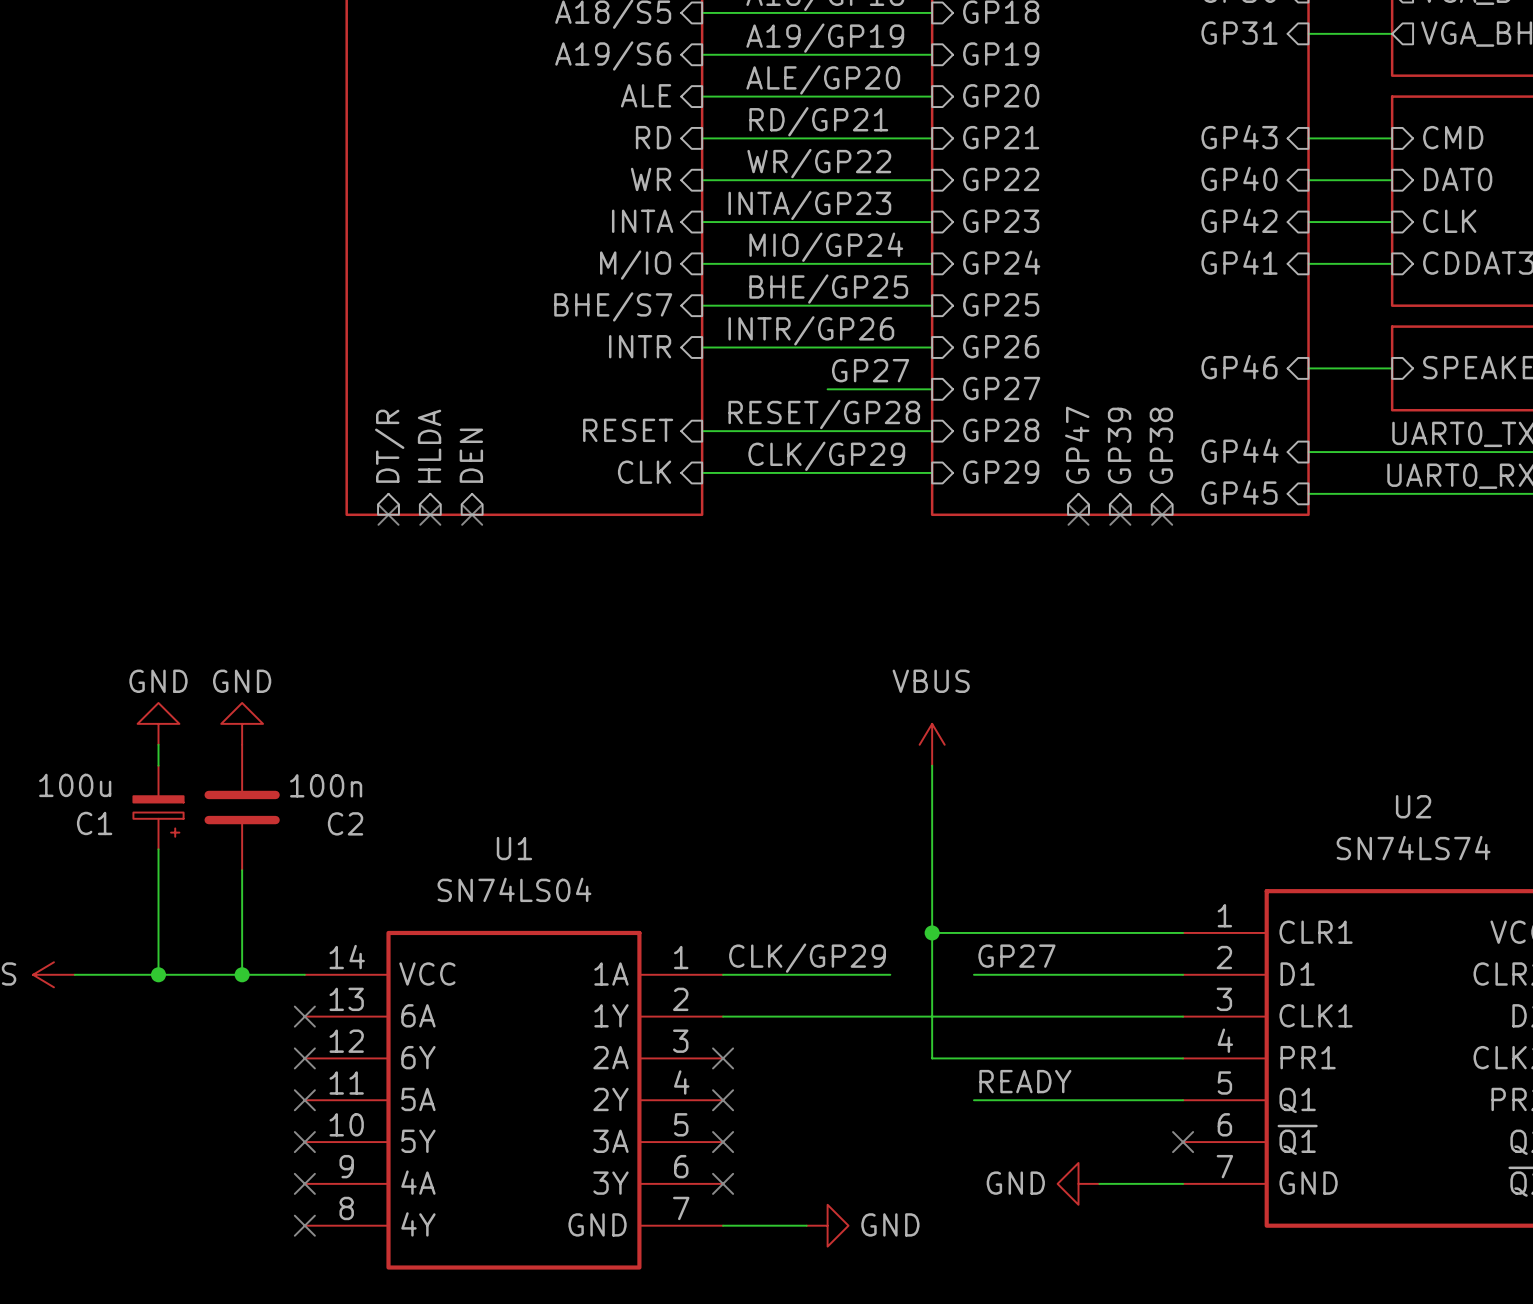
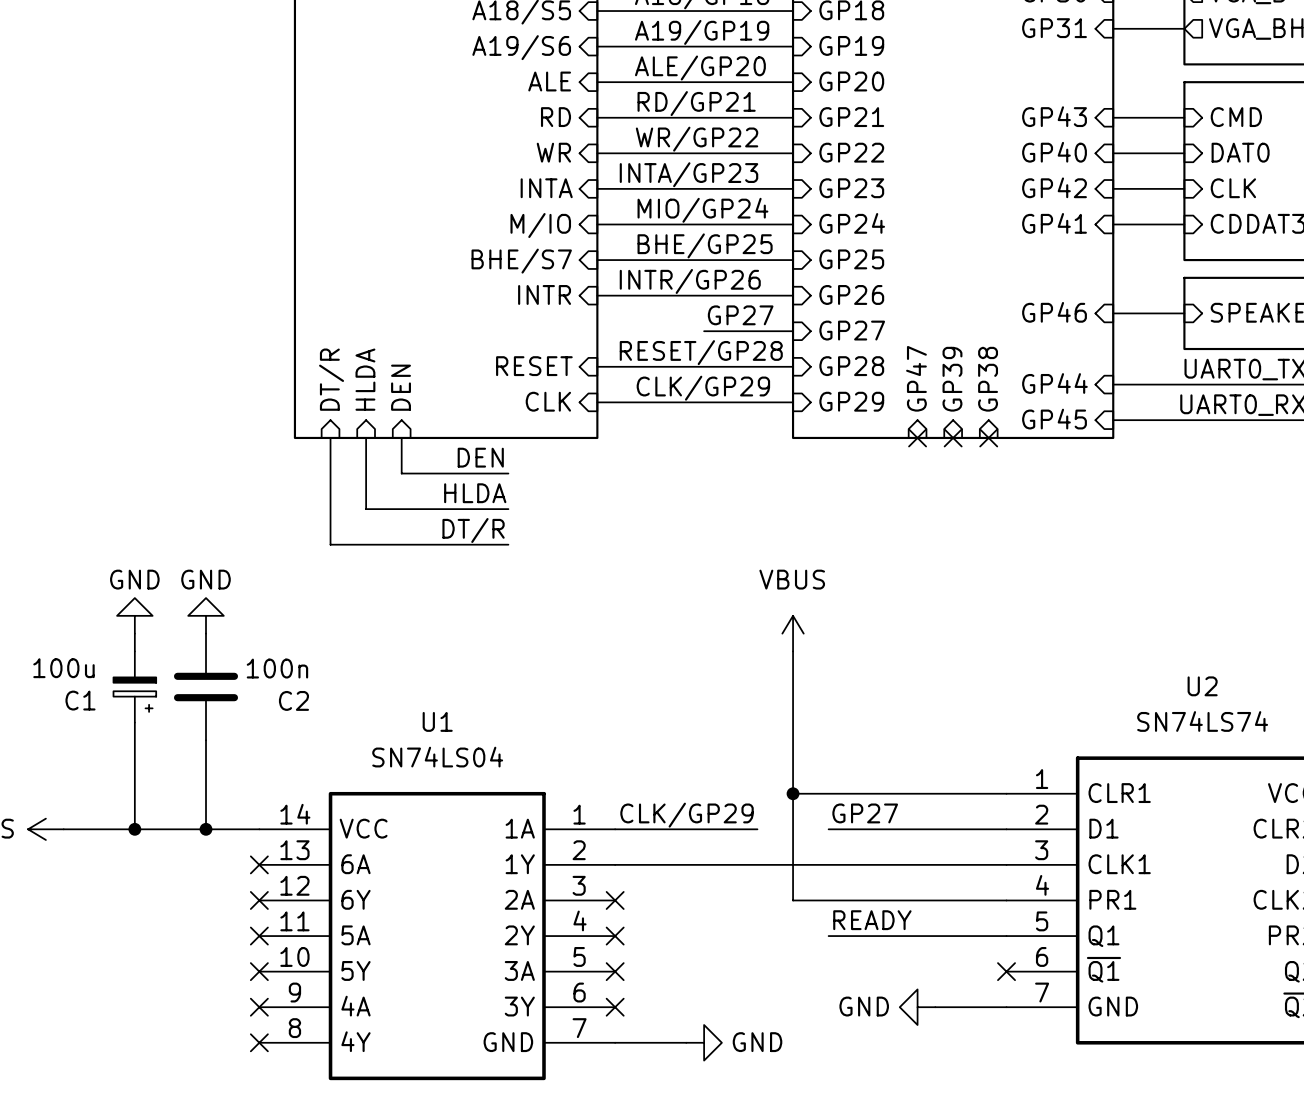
wire: none -> (330, 437) (330, 544) (508, 544)
no-connect mark: (388, 514) -> none
wire: none -> (366, 437) (366, 509) (508, 509)
no-connect mark: (430, 514) -> none
wire: none -> (401, 437) (401, 473) (508, 473)
no-connect mark: (472, 514) -> none
label: none -> DEN (480, 457)
label: none -> HLDA (475, 493)
label: none -> DT/R (473, 530)

